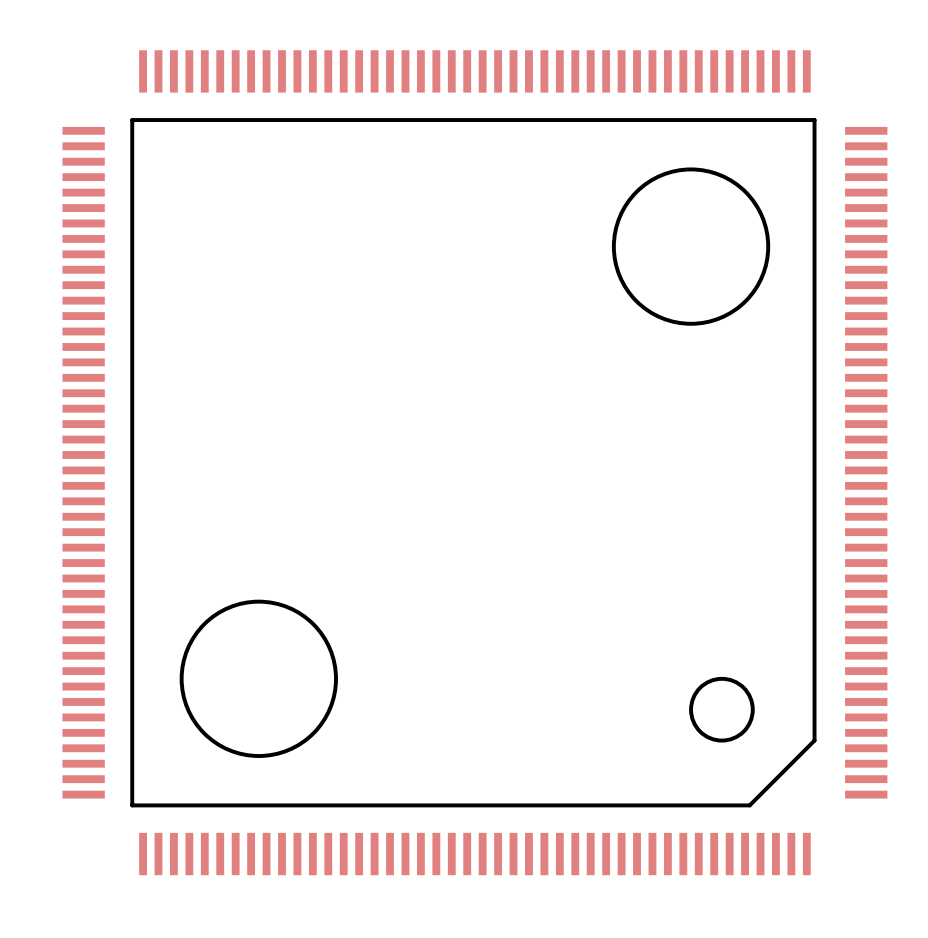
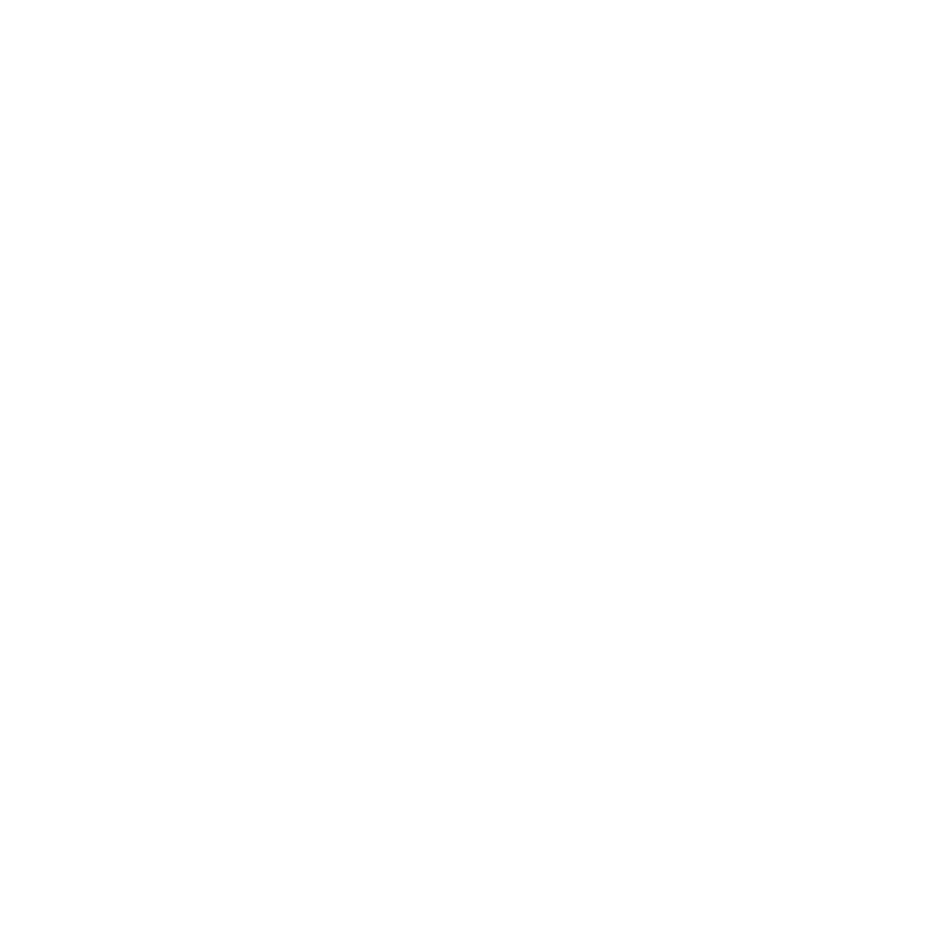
part: (474, 462) -> none

